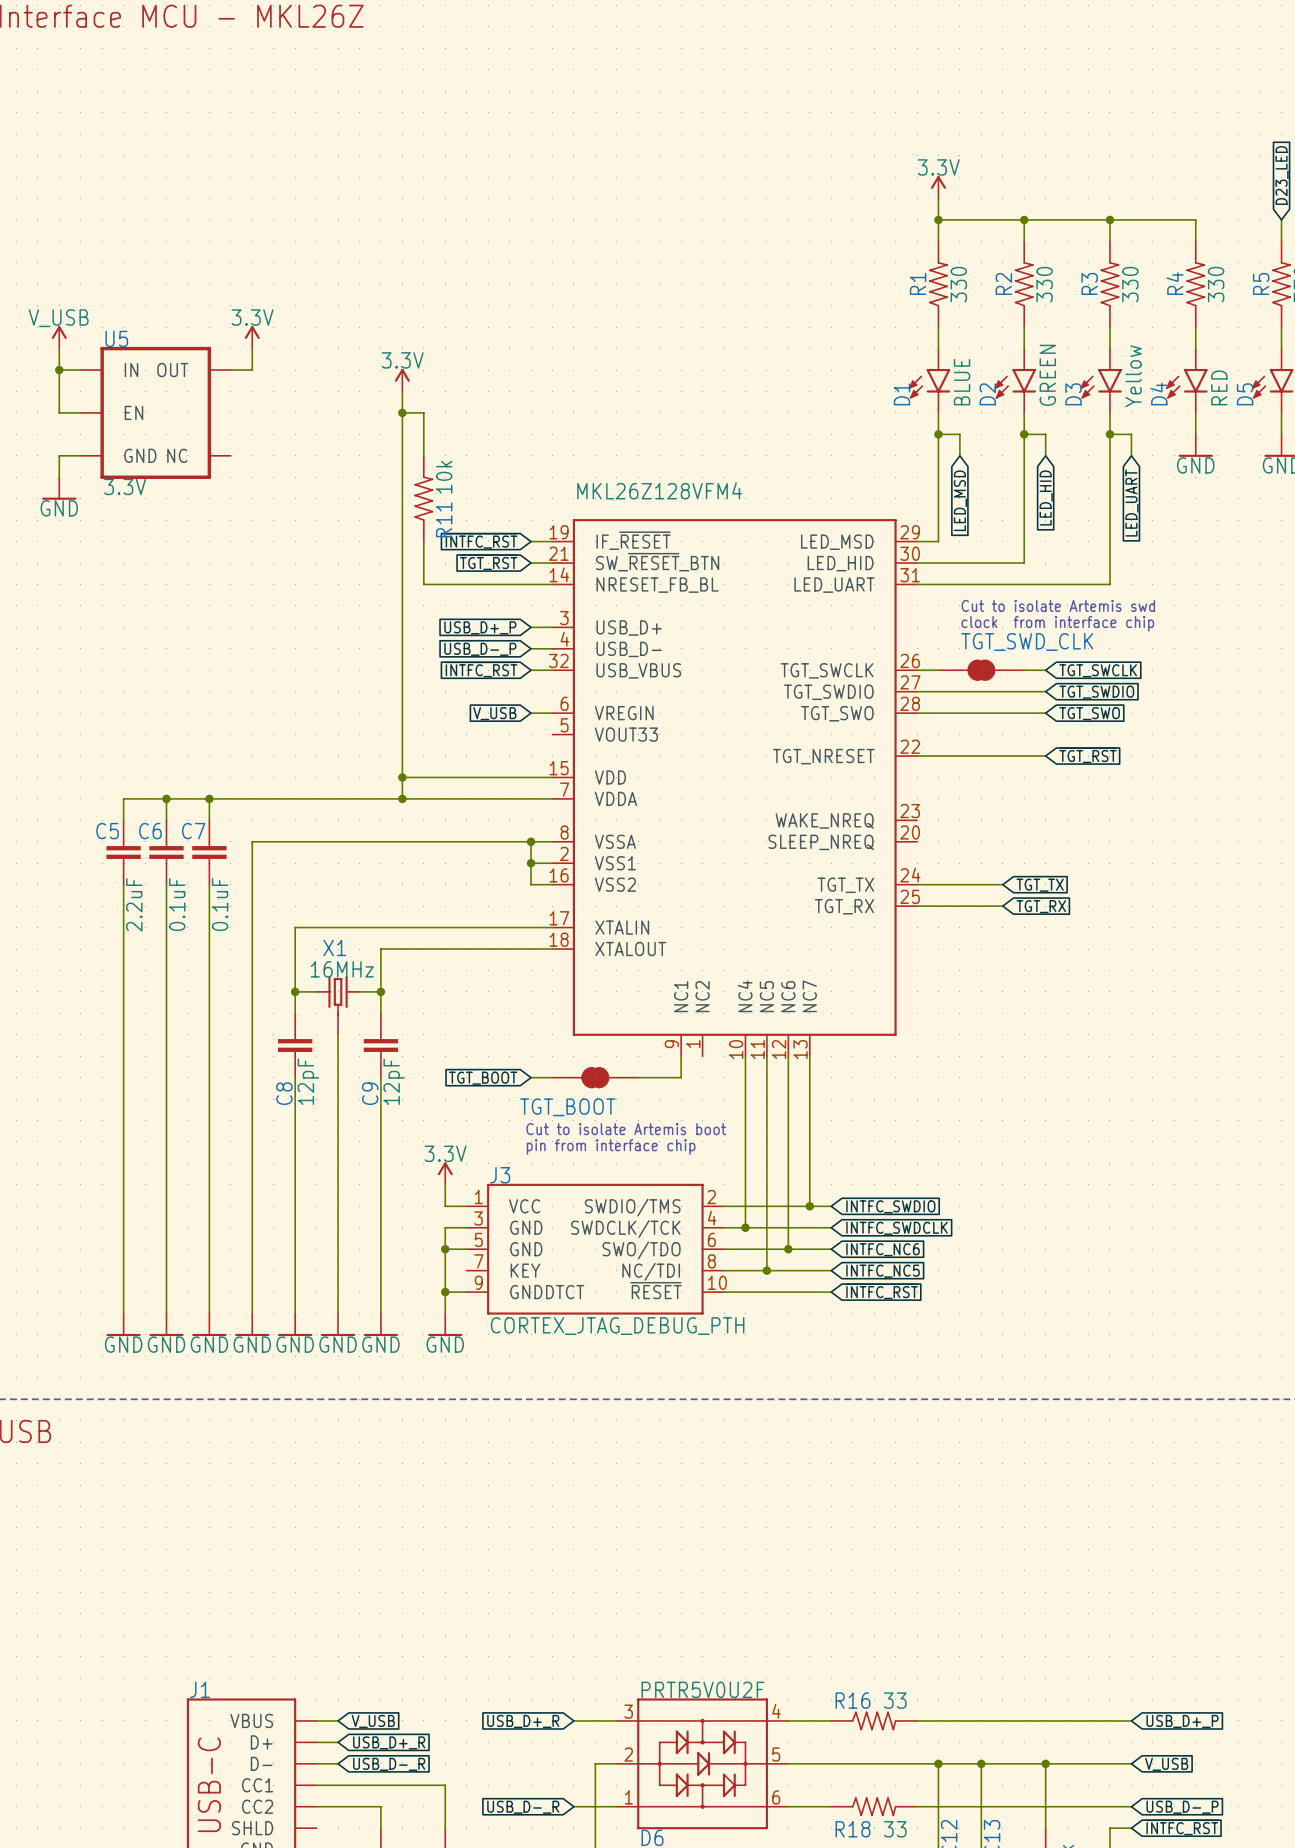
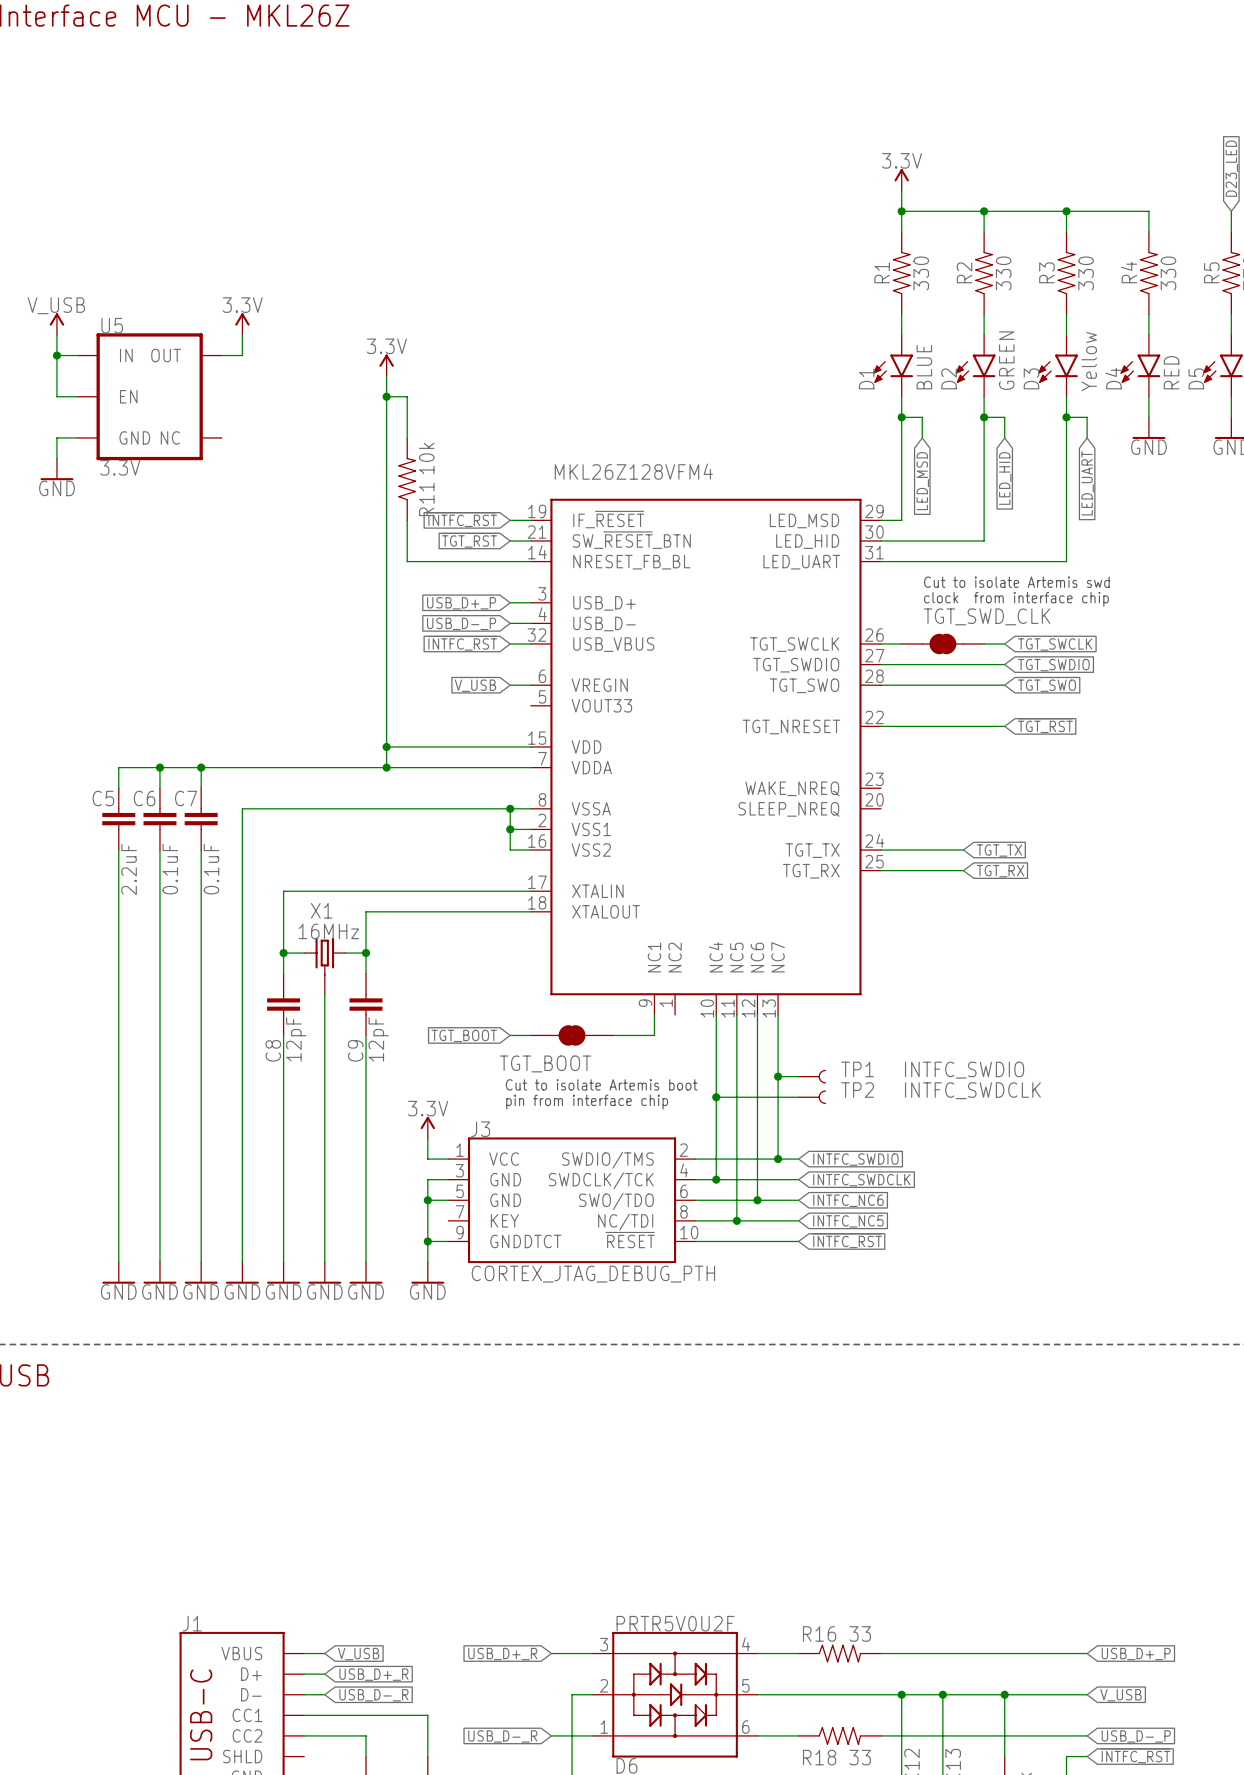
wire: none -> (778, 1076) (798, 1076)
junction: none -> (778, 1076)
TP1: none -> INTFC_SWDIO (812, 1076)
wire: none -> (716, 1097) (798, 1097)
junction: none -> (716, 1097)
TP2: none -> INTFC_SWDCLK (812, 1097)

